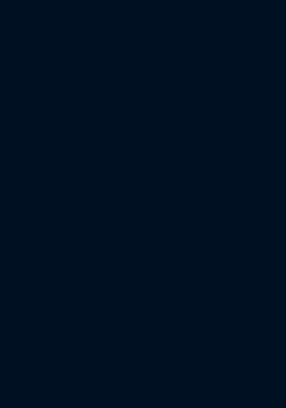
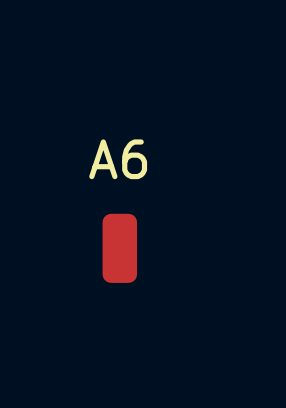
A6: none -> (119, 248)

